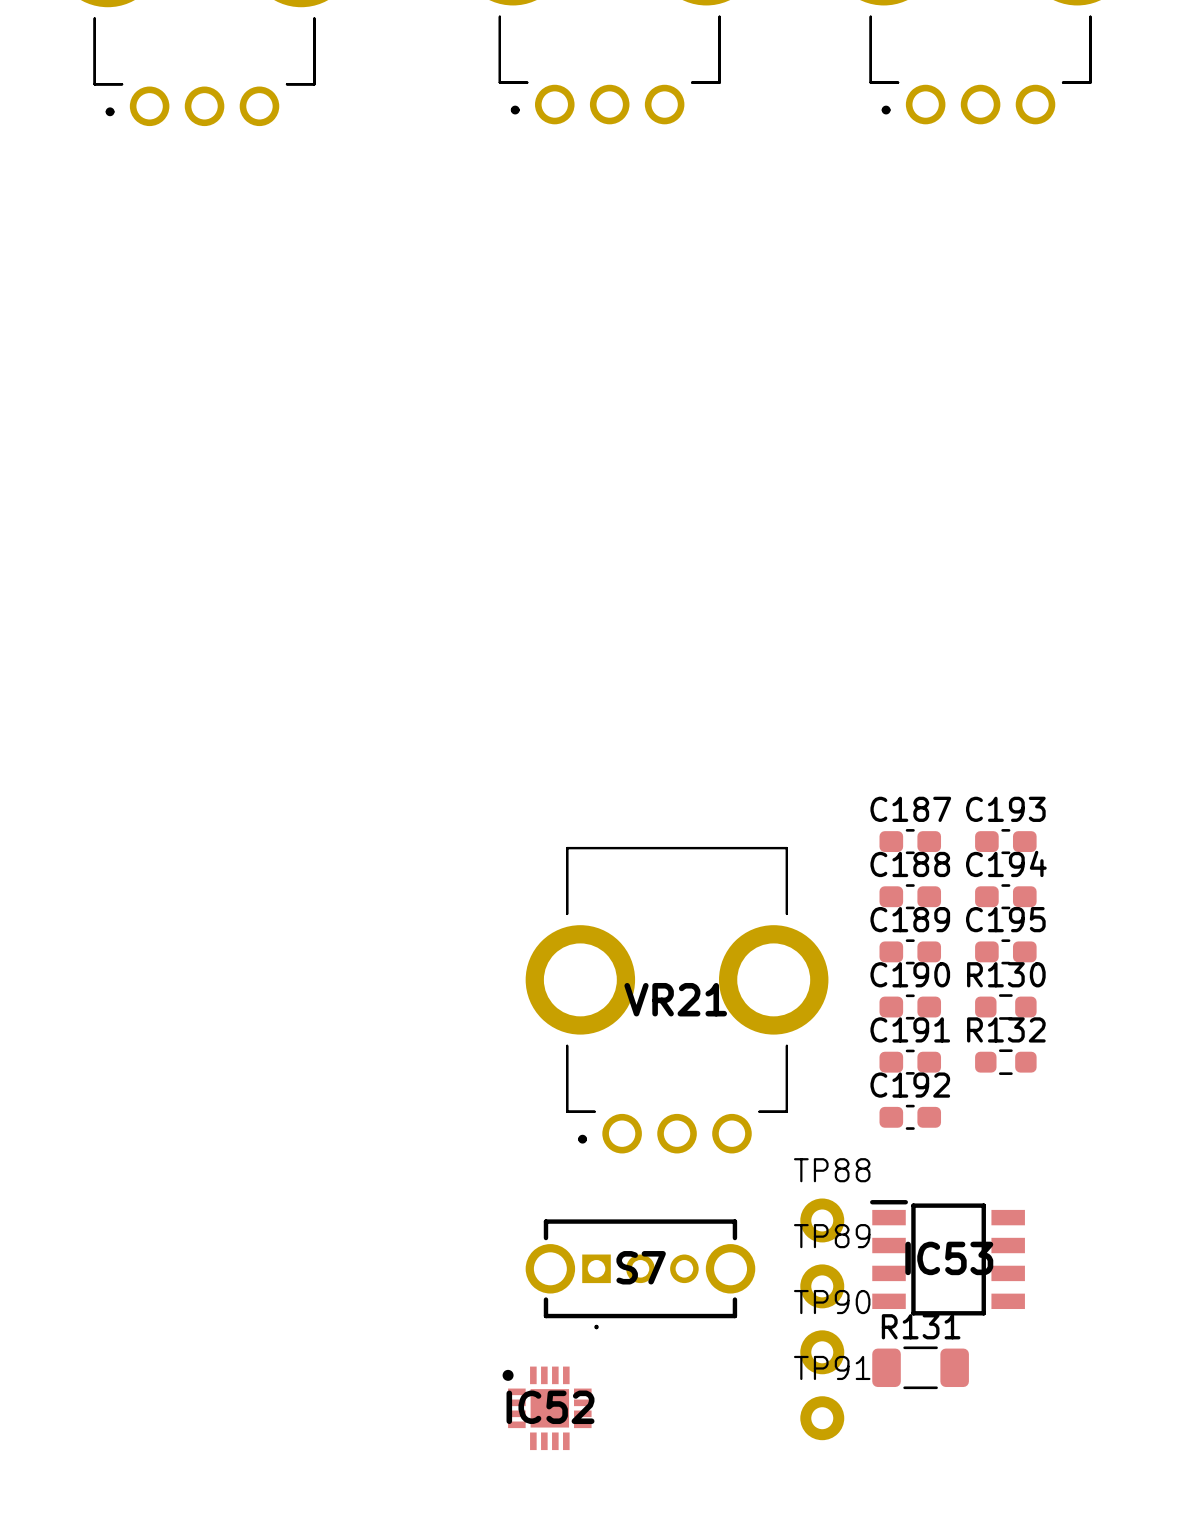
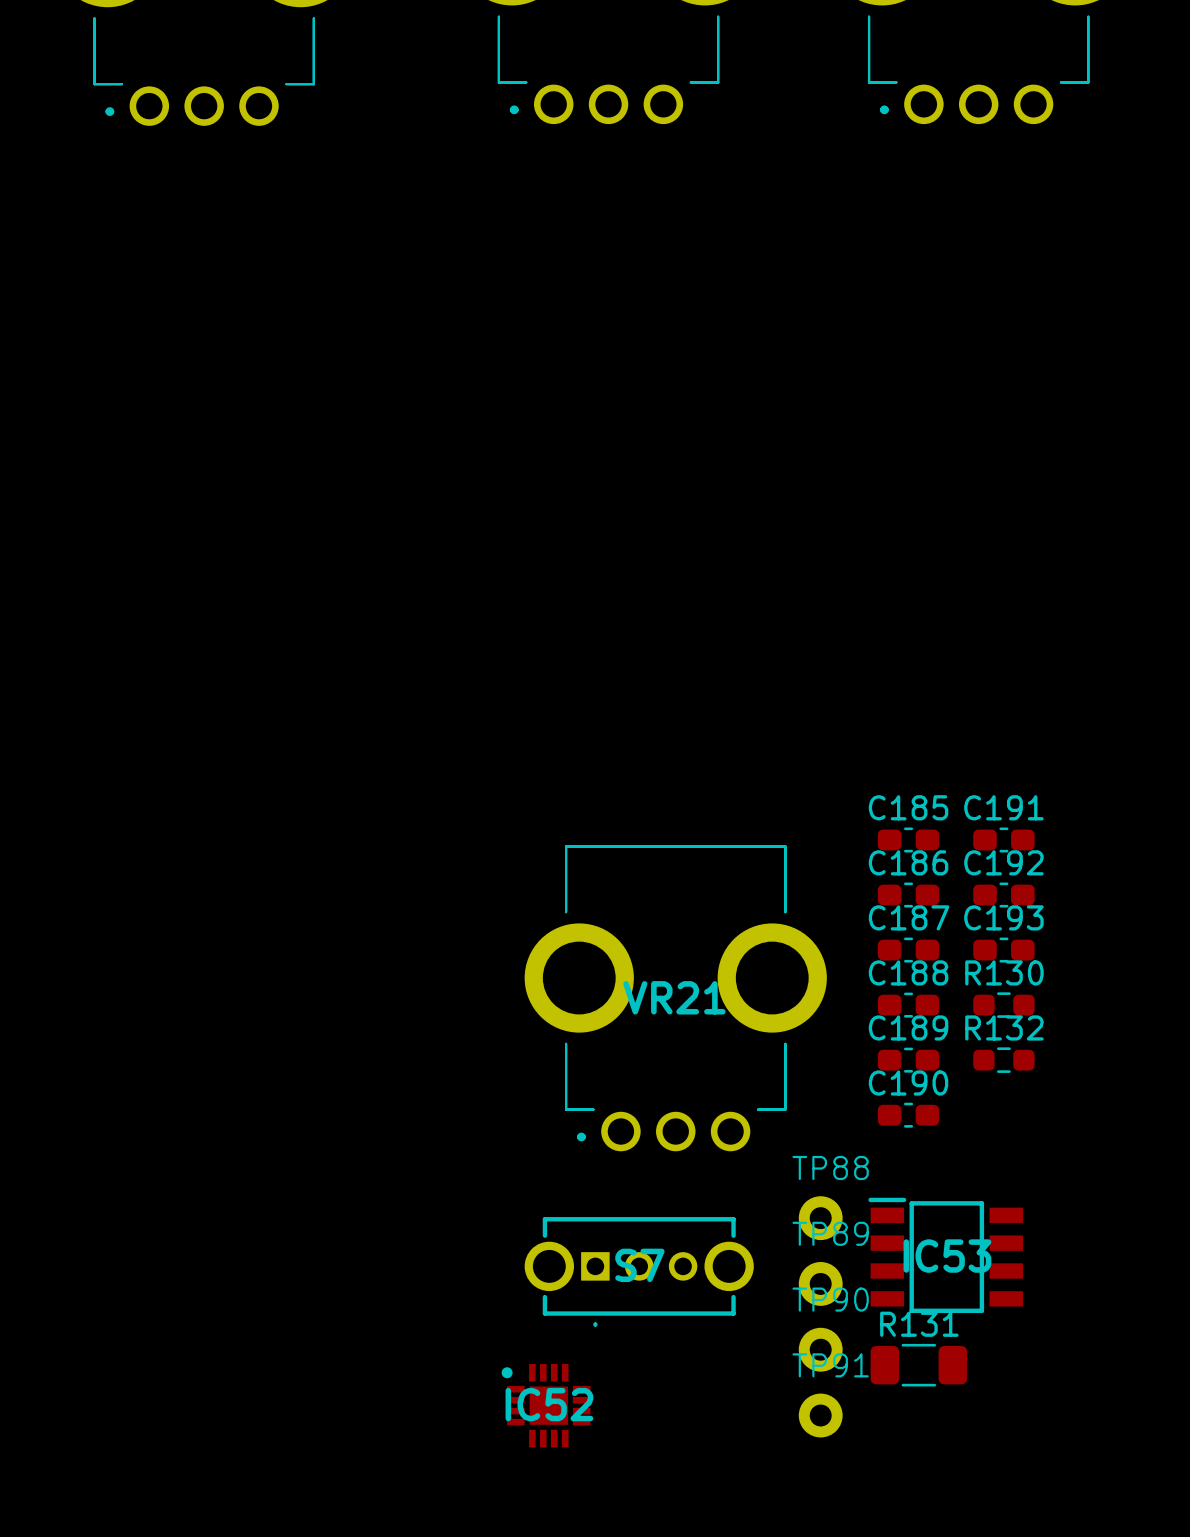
C187 name: C187 (910, 809) -> C185 (908, 807)
C193 name: C193 (1005, 809) -> C191 (1003, 807)
C194 name: C194 (1006, 863) -> C192 (1003, 862)
C188 name: C188 (910, 864) -> C186 (908, 862)
C189 name: C189 (910, 919) -> C187 (909, 917)
C195 name: C195 (1005, 919) -> C193 (1003, 917)
C190 name: C190 (910, 974) -> C188 (908, 972)
C191 name: C191 (910, 1029) -> C189 (908, 1027)
C192 name: C192 (910, 1085) -> C190 (908, 1083)

